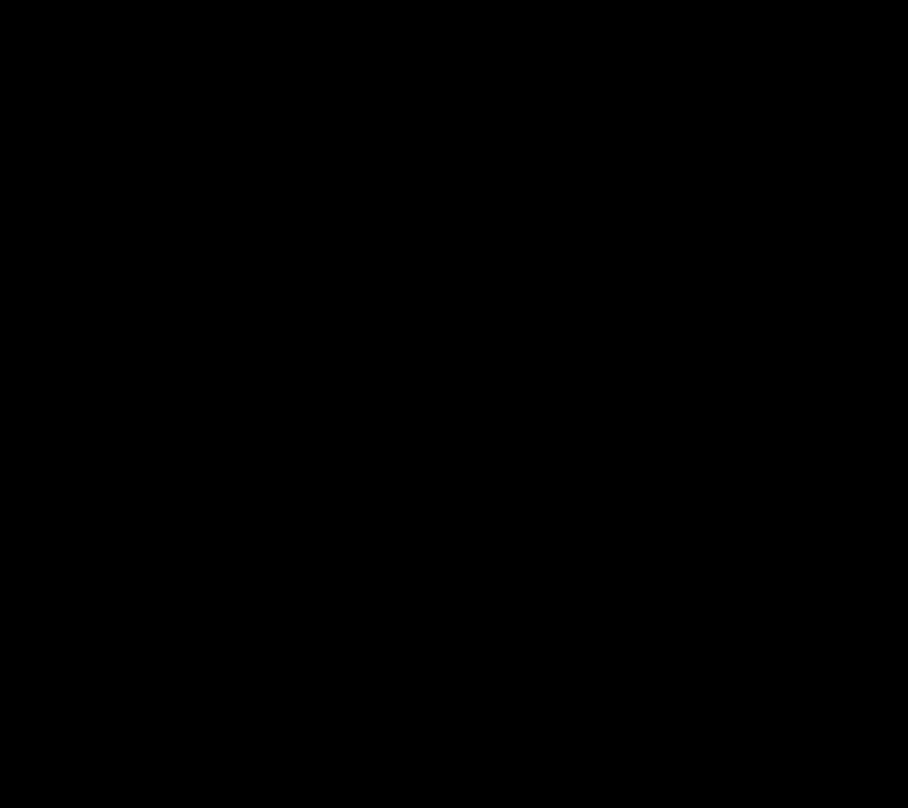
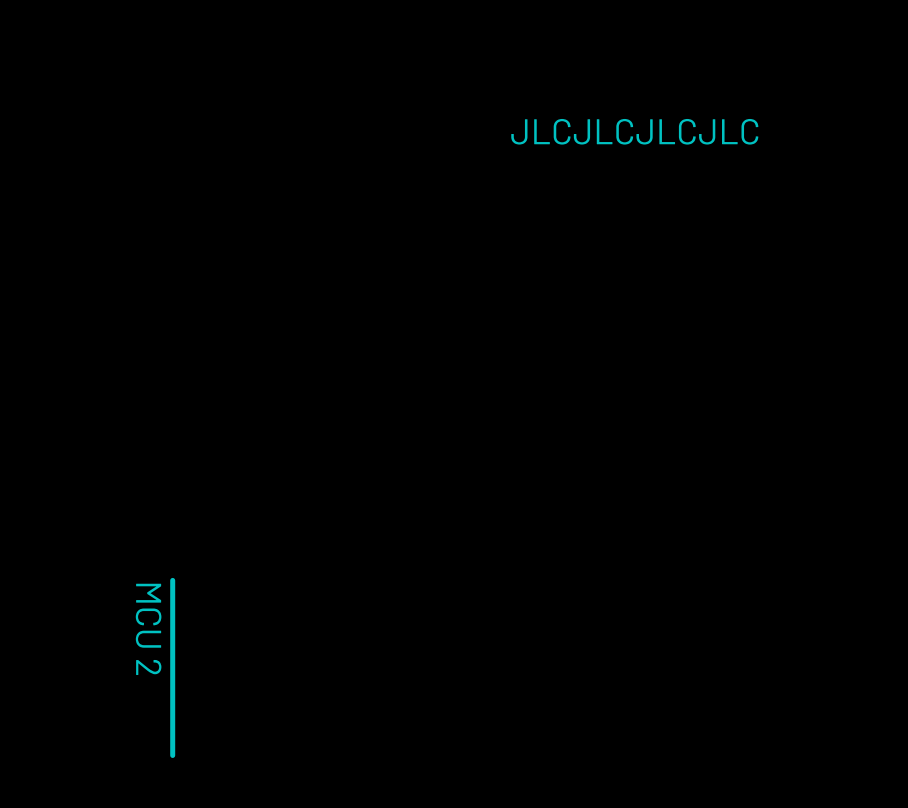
text: none -> JLCJLCJLCJLC (634, 131)
line: none -> (172, 580) (172, 755)
text: none -> MCU 2 (148, 629)

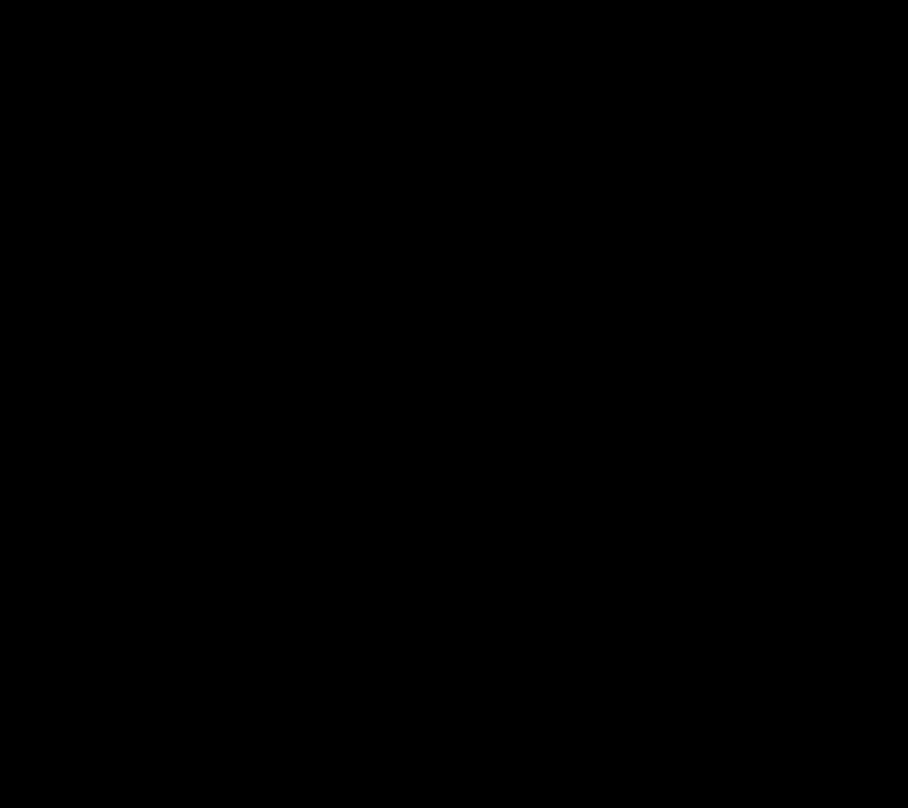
text: JLCJLCJLCJLC (634, 131) -> none
line: (172, 580) (172, 755) -> none
text: MCU 2 (148, 629) -> none

